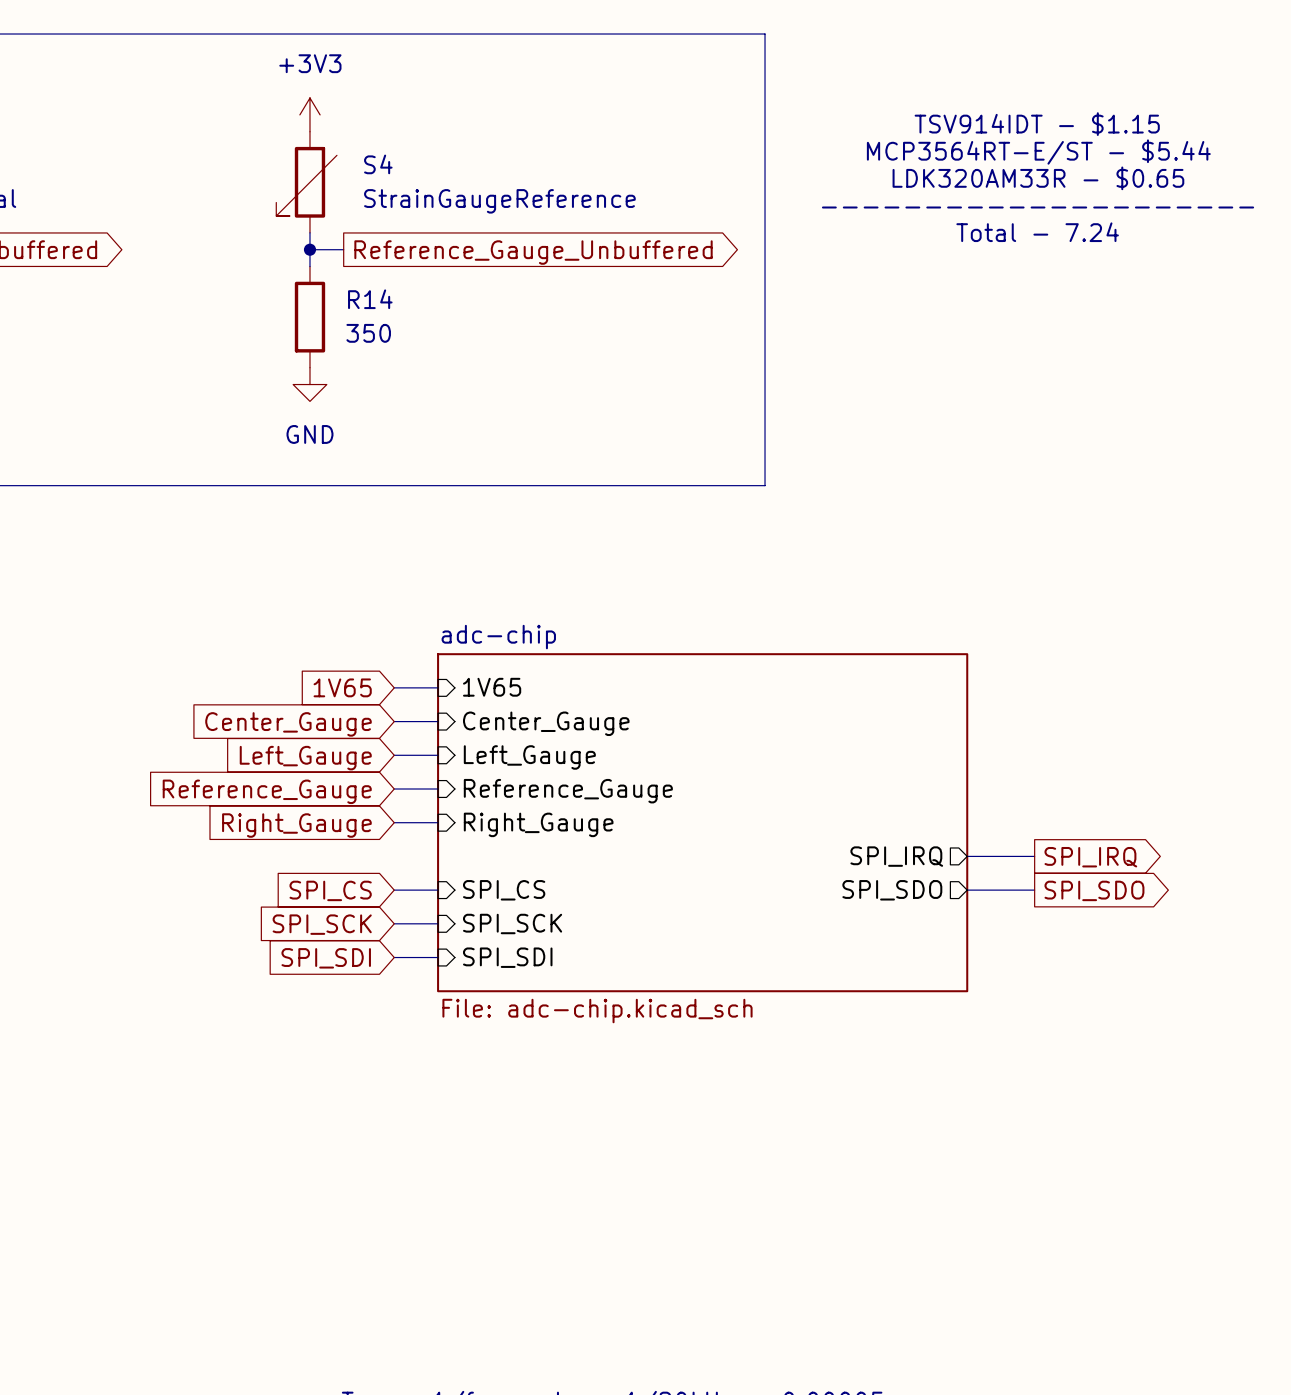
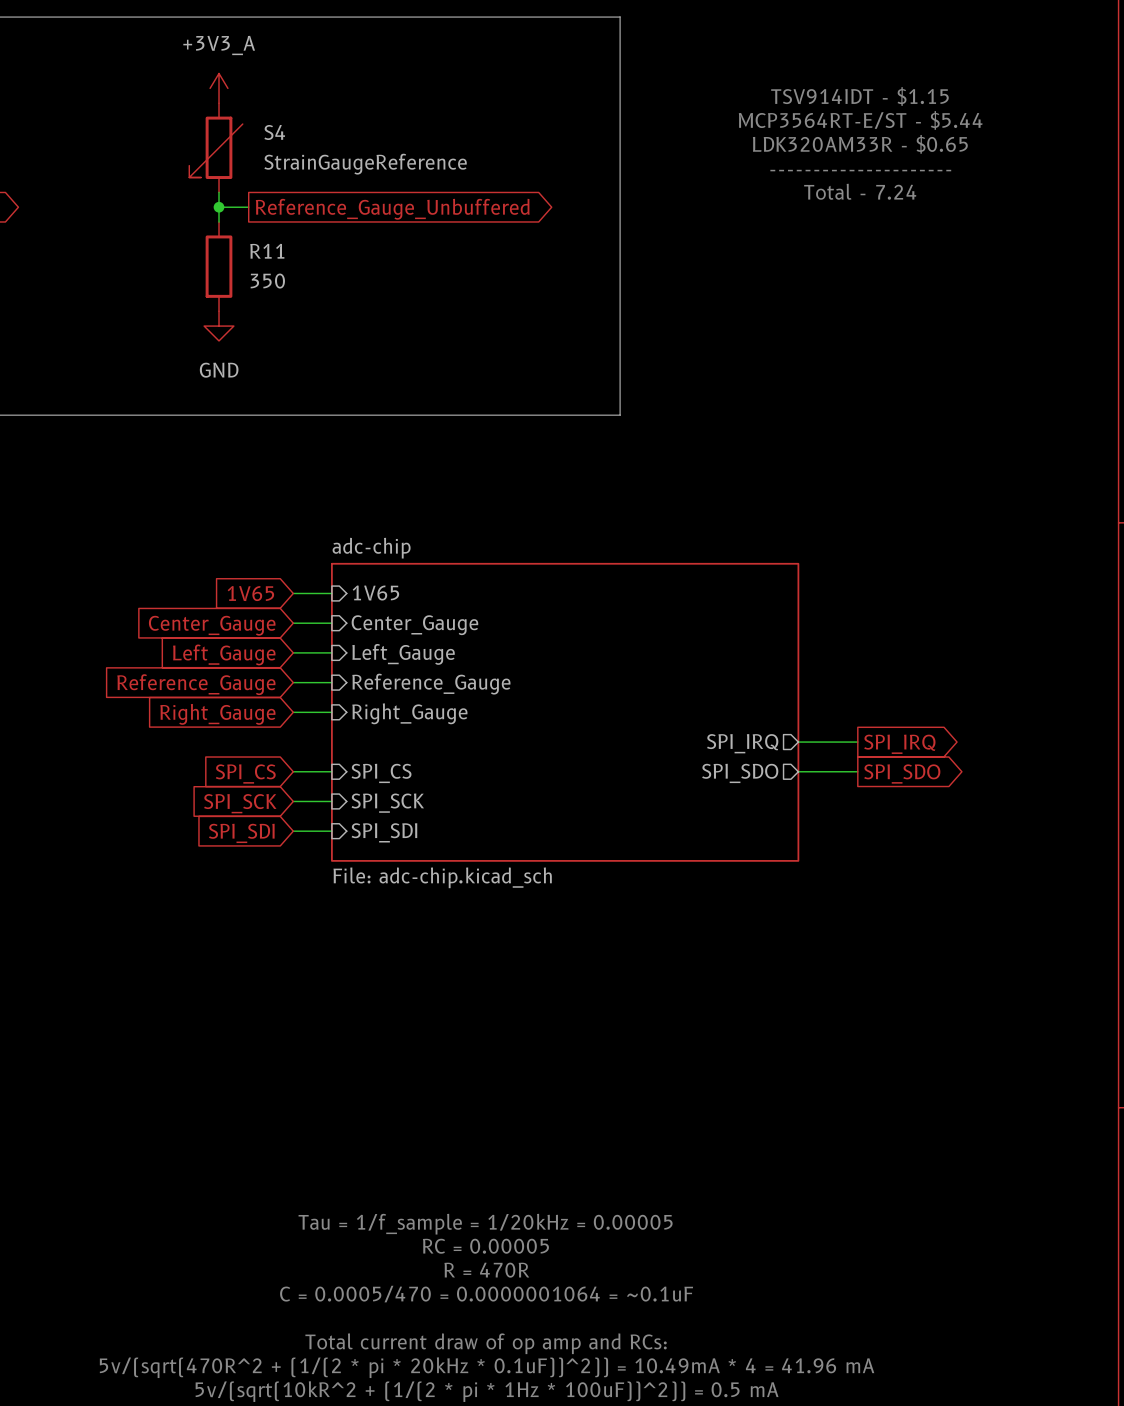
power symbol: +3V3 (309, 114) -> +3V3_A (219, 88)
R14 name: R14 (370, 299) -> R11 (267, 251)

